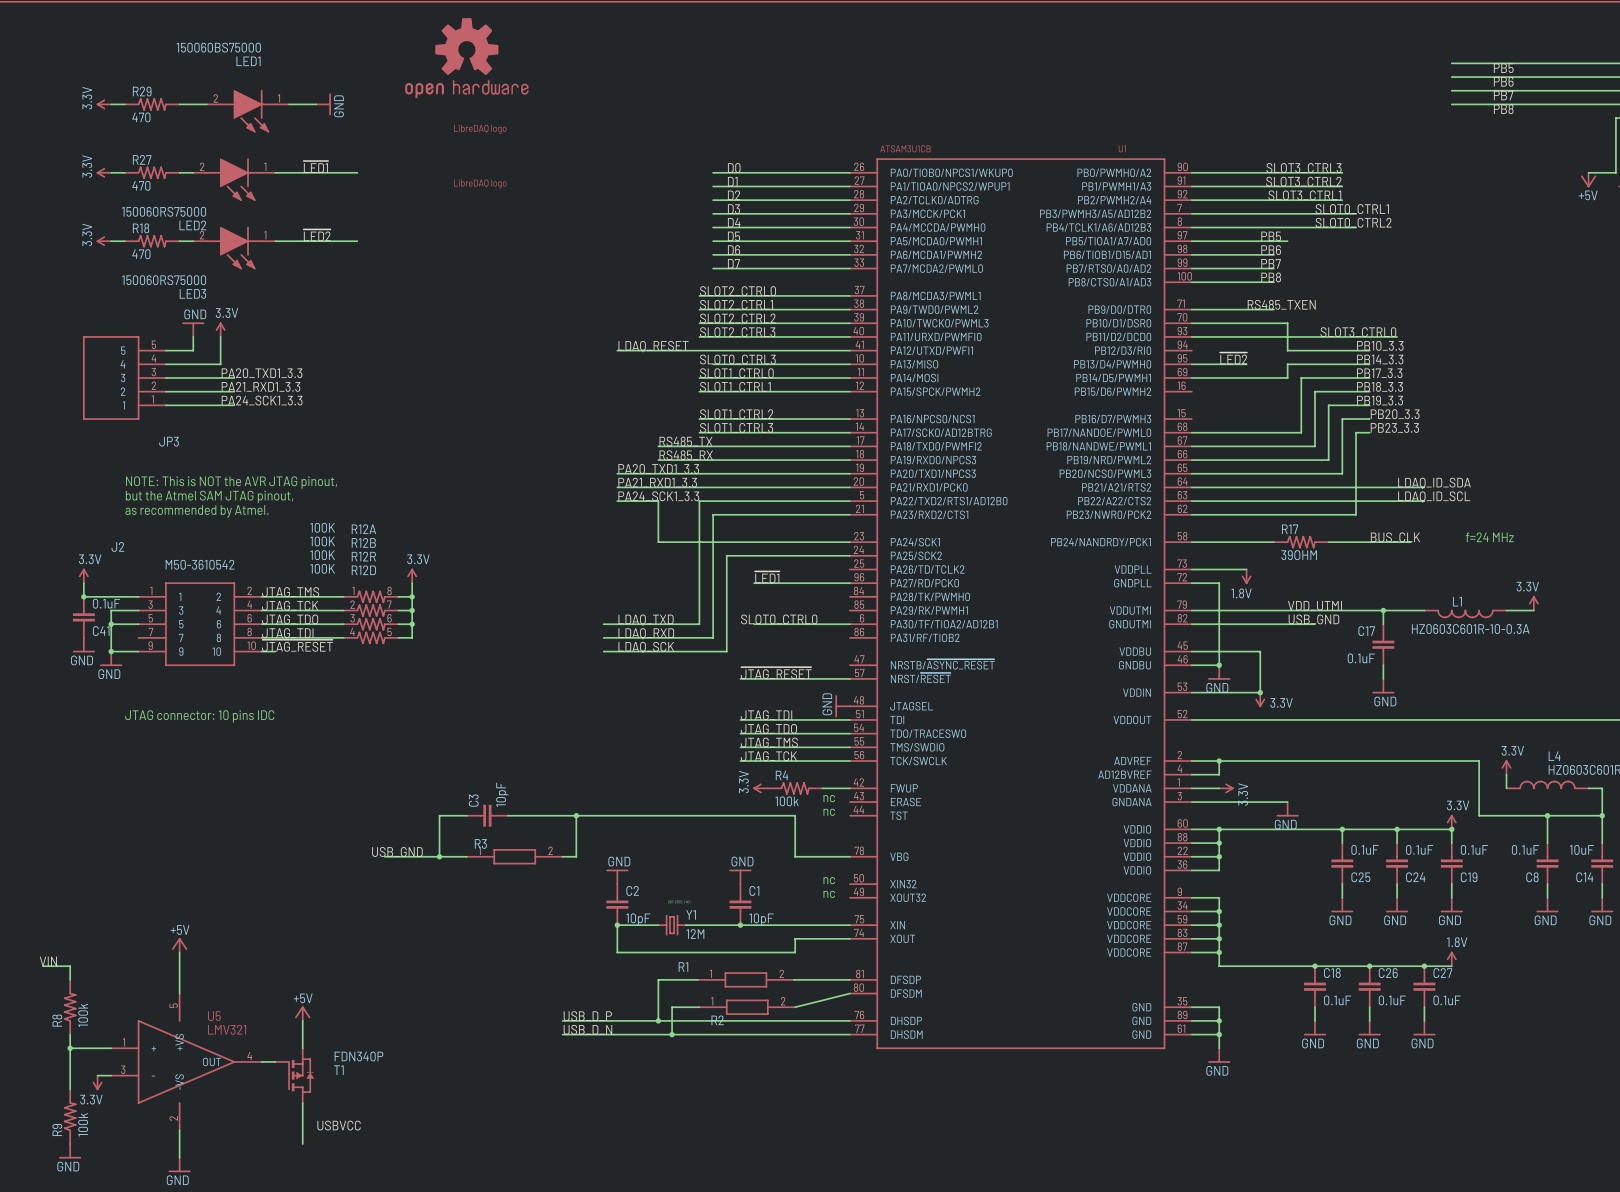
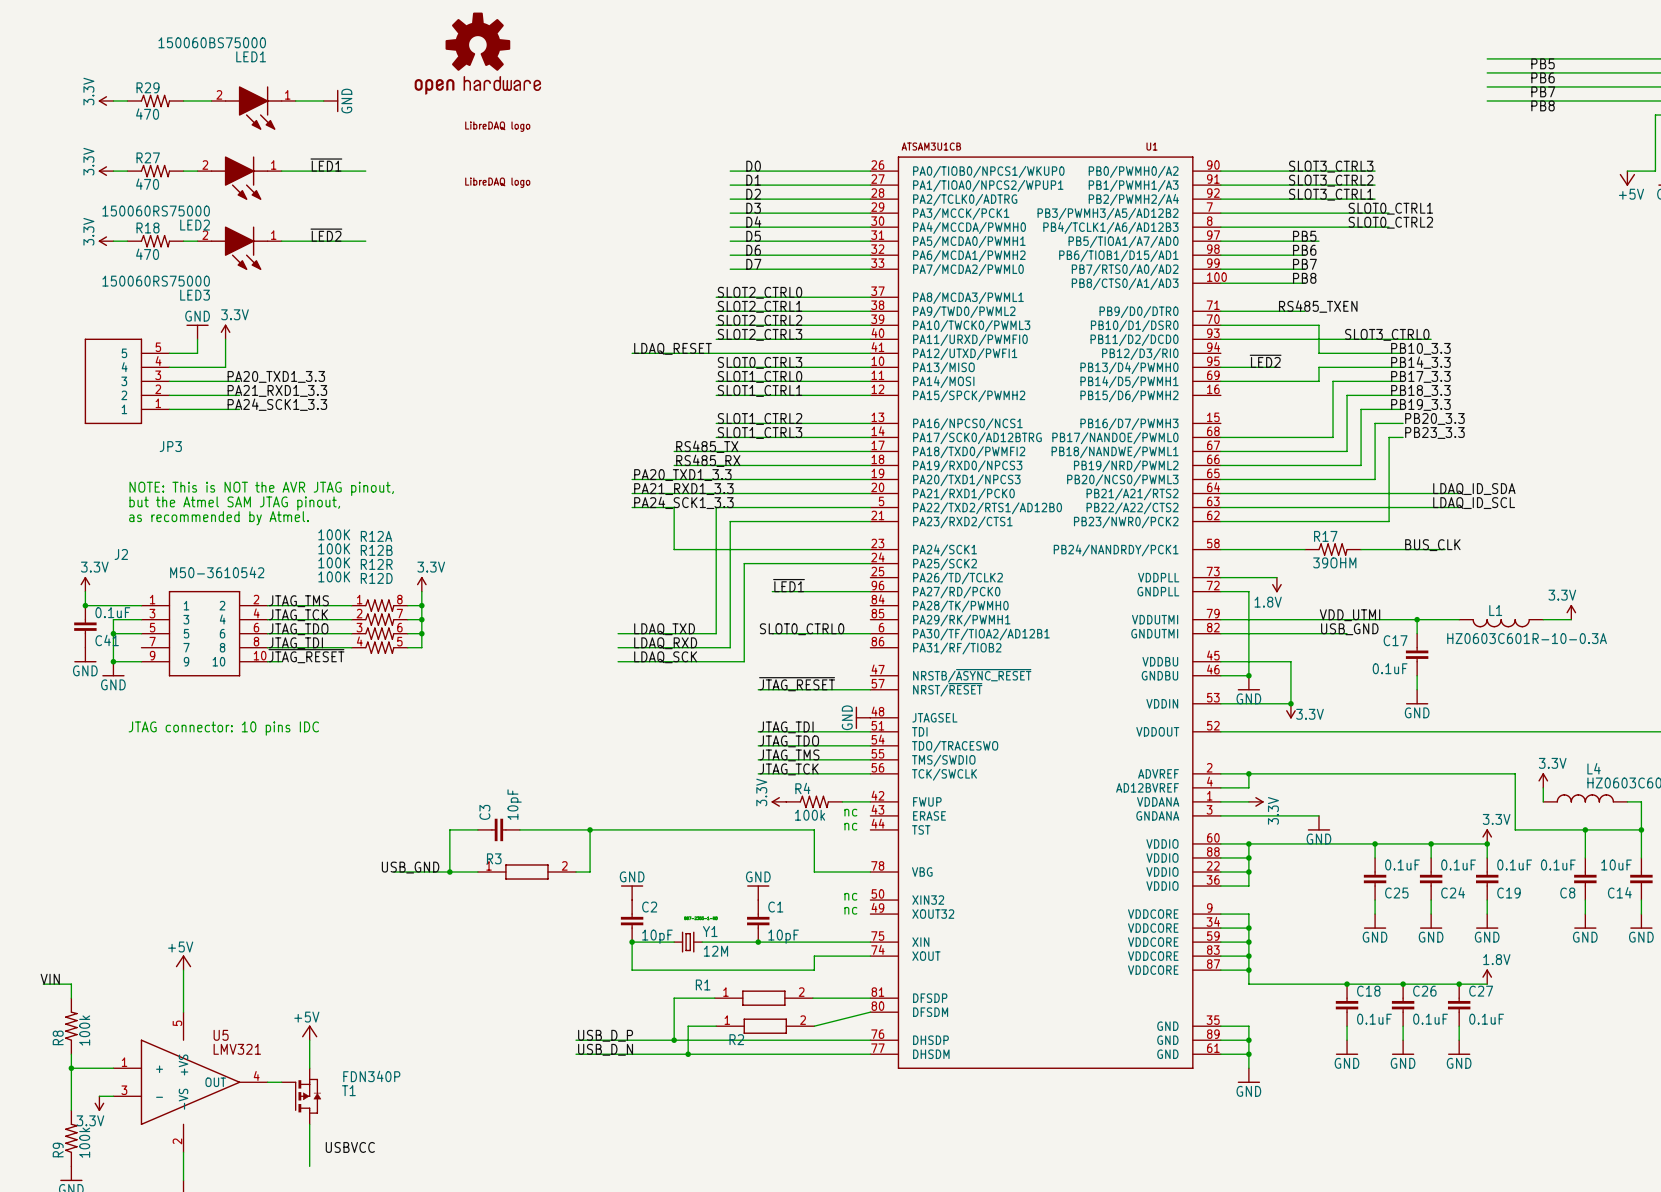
text: f=24 MHz (1489, 537) -> none

